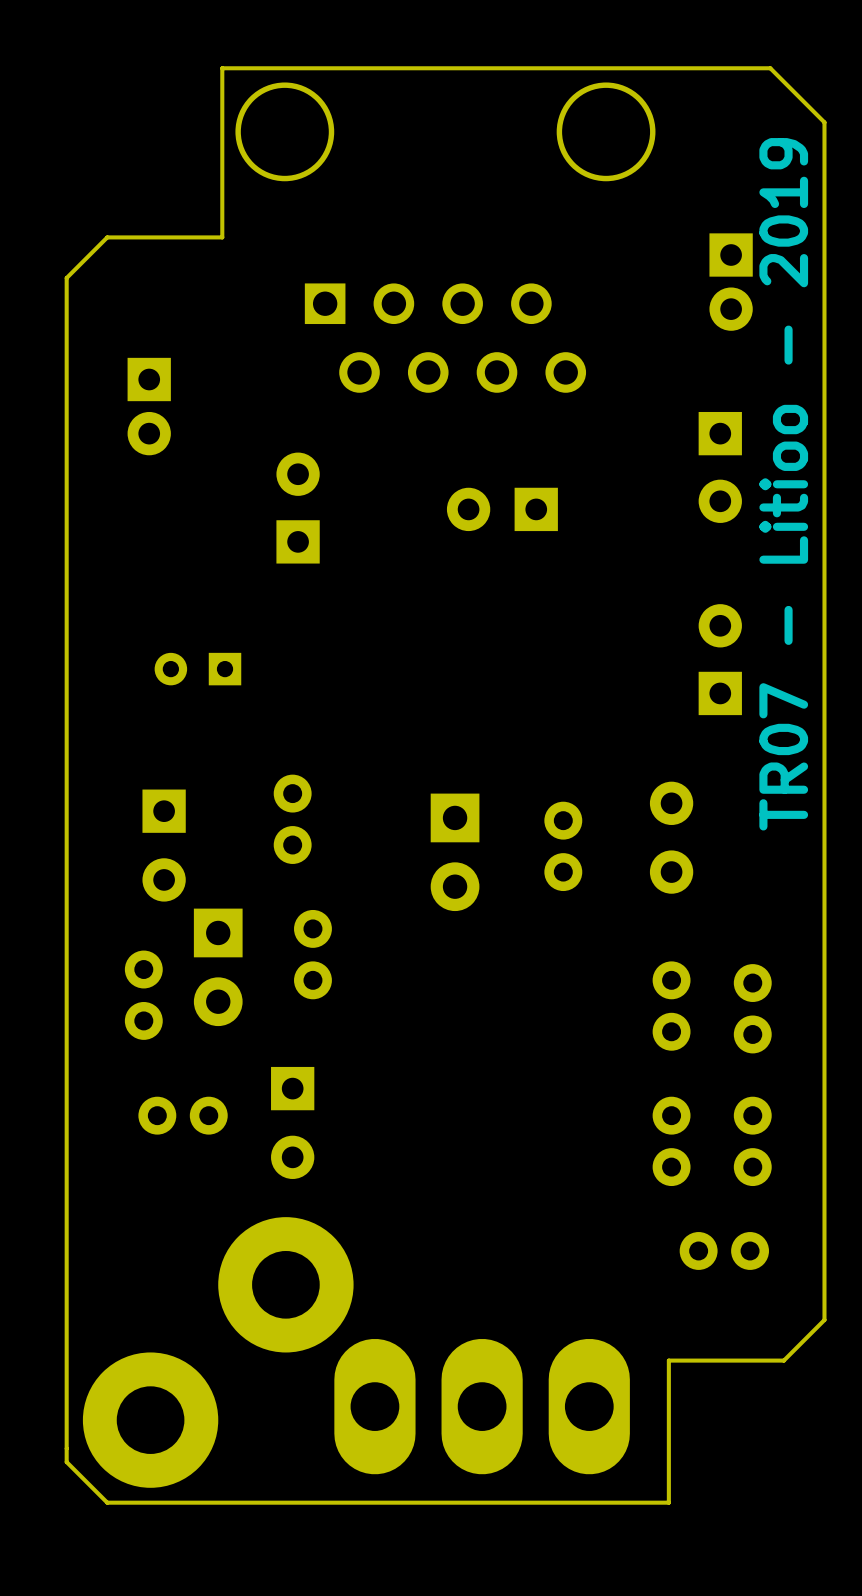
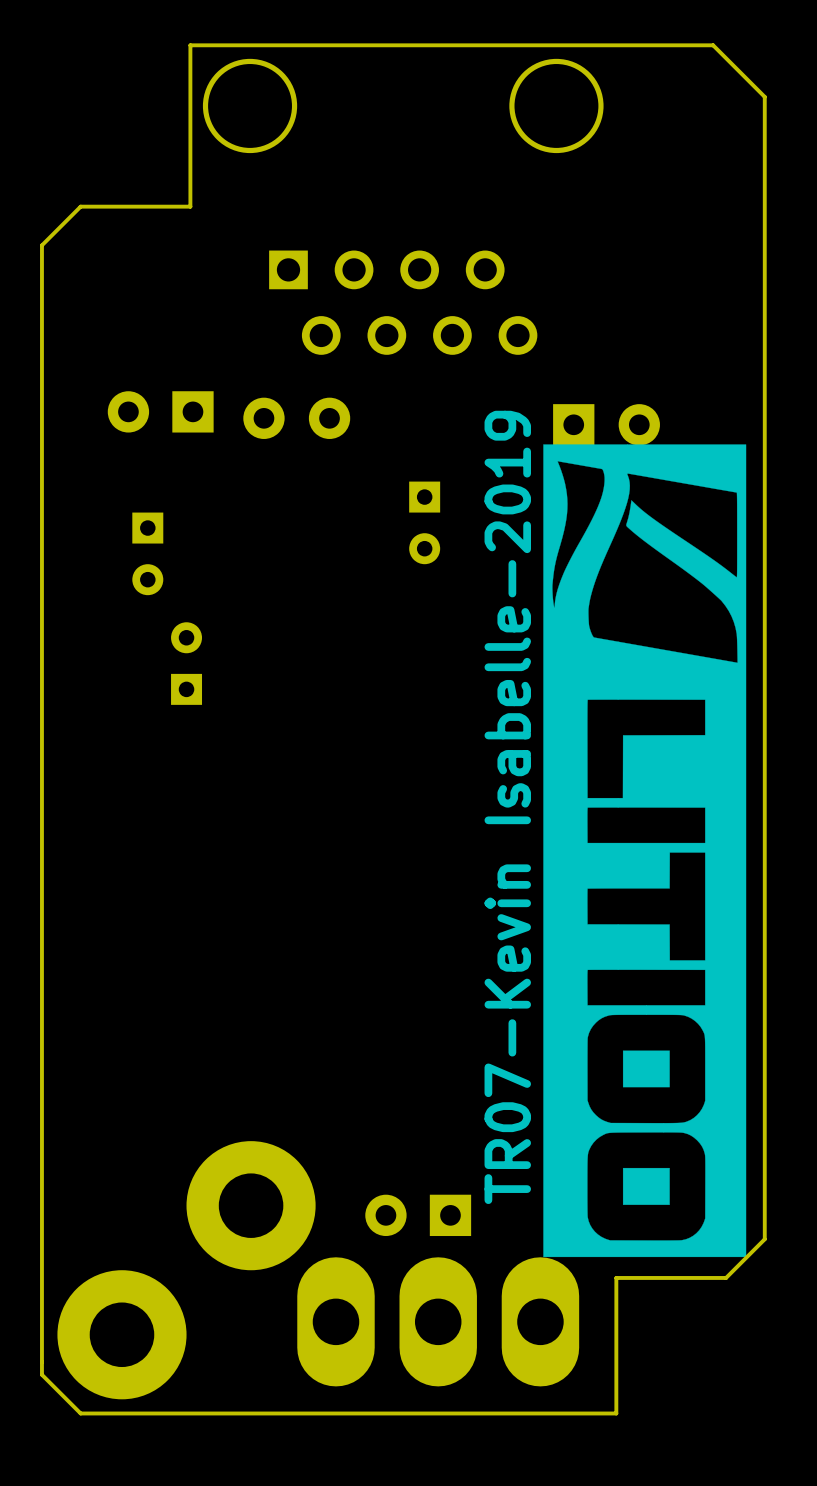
part: (731, 282) -> none
part: (149, 406) -> none
part: none -> (606, 424)
part: (720, 467) -> none
text: TR07 - Litioo - 2019 (783, 484) -> none
drawing: none -> [543, 444, 747, 1258]
part rotation: 0° (298, 508) -> 90° counterclockwise (160, 411)
part position: (298, 508) -> (160, 411)
part: (502, 509) -> none
part: none -> (424, 522)
part: none -> (147, 553)
part: (720, 659) -> none
part: (197, 669) -> none
part: none -> (186, 663)
part: (292, 819) -> none
part rotation: 0° (671, 837) -> 90° clockwise (296, 418)
part position: (671, 837) -> (296, 418)
part: (164, 845) -> none
part: (563, 846) -> none
part: (455, 852) -> none
text: none -> TR07-Kevin Isabelle-2019 (507, 807)
part: (312, 954) -> none
part: (218, 967) -> none
part: (143, 995) -> none
part: (671, 1006) -> none
part: (752, 1008) -> none
part: (183, 1115) -> none
part: (292, 1122) -> none
part: (671, 1141) -> none
part: (752, 1141) -> none
part: (724, 1250) -> none
part: none -> (418, 1215)

